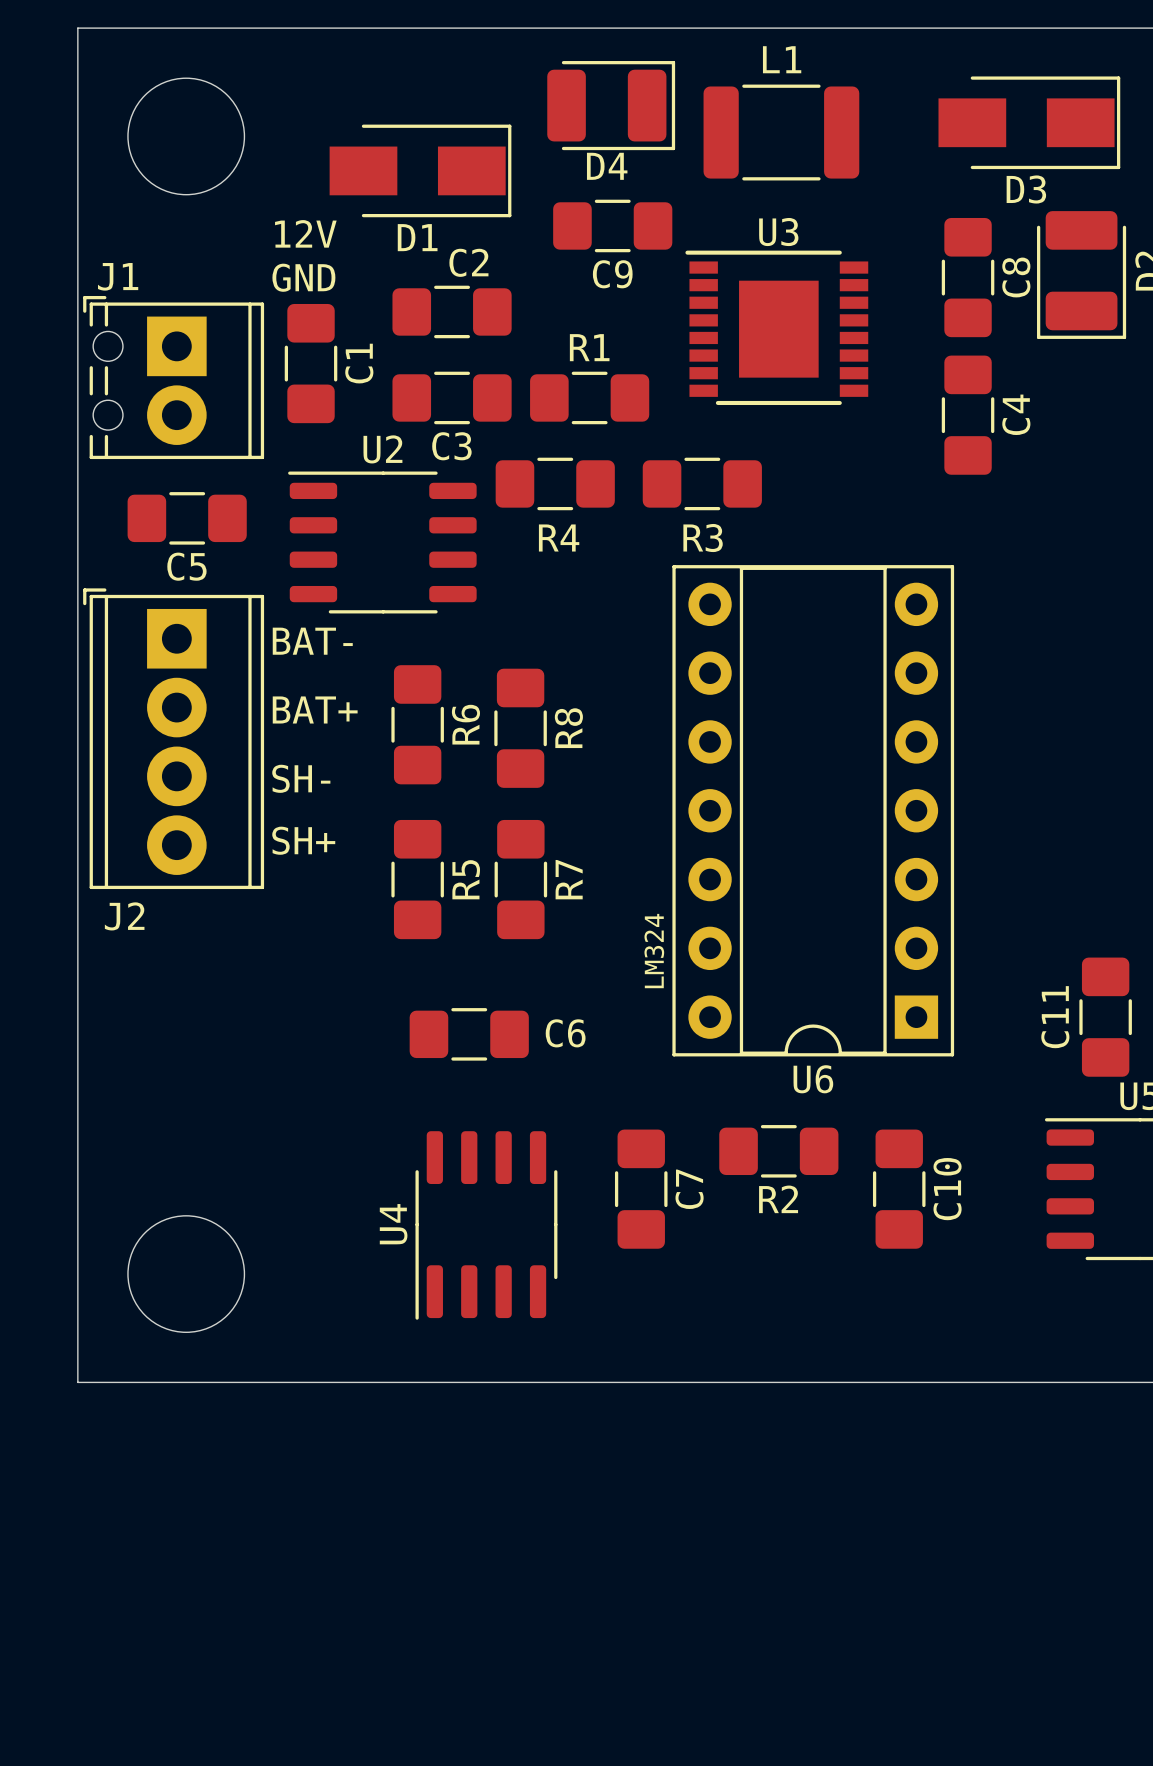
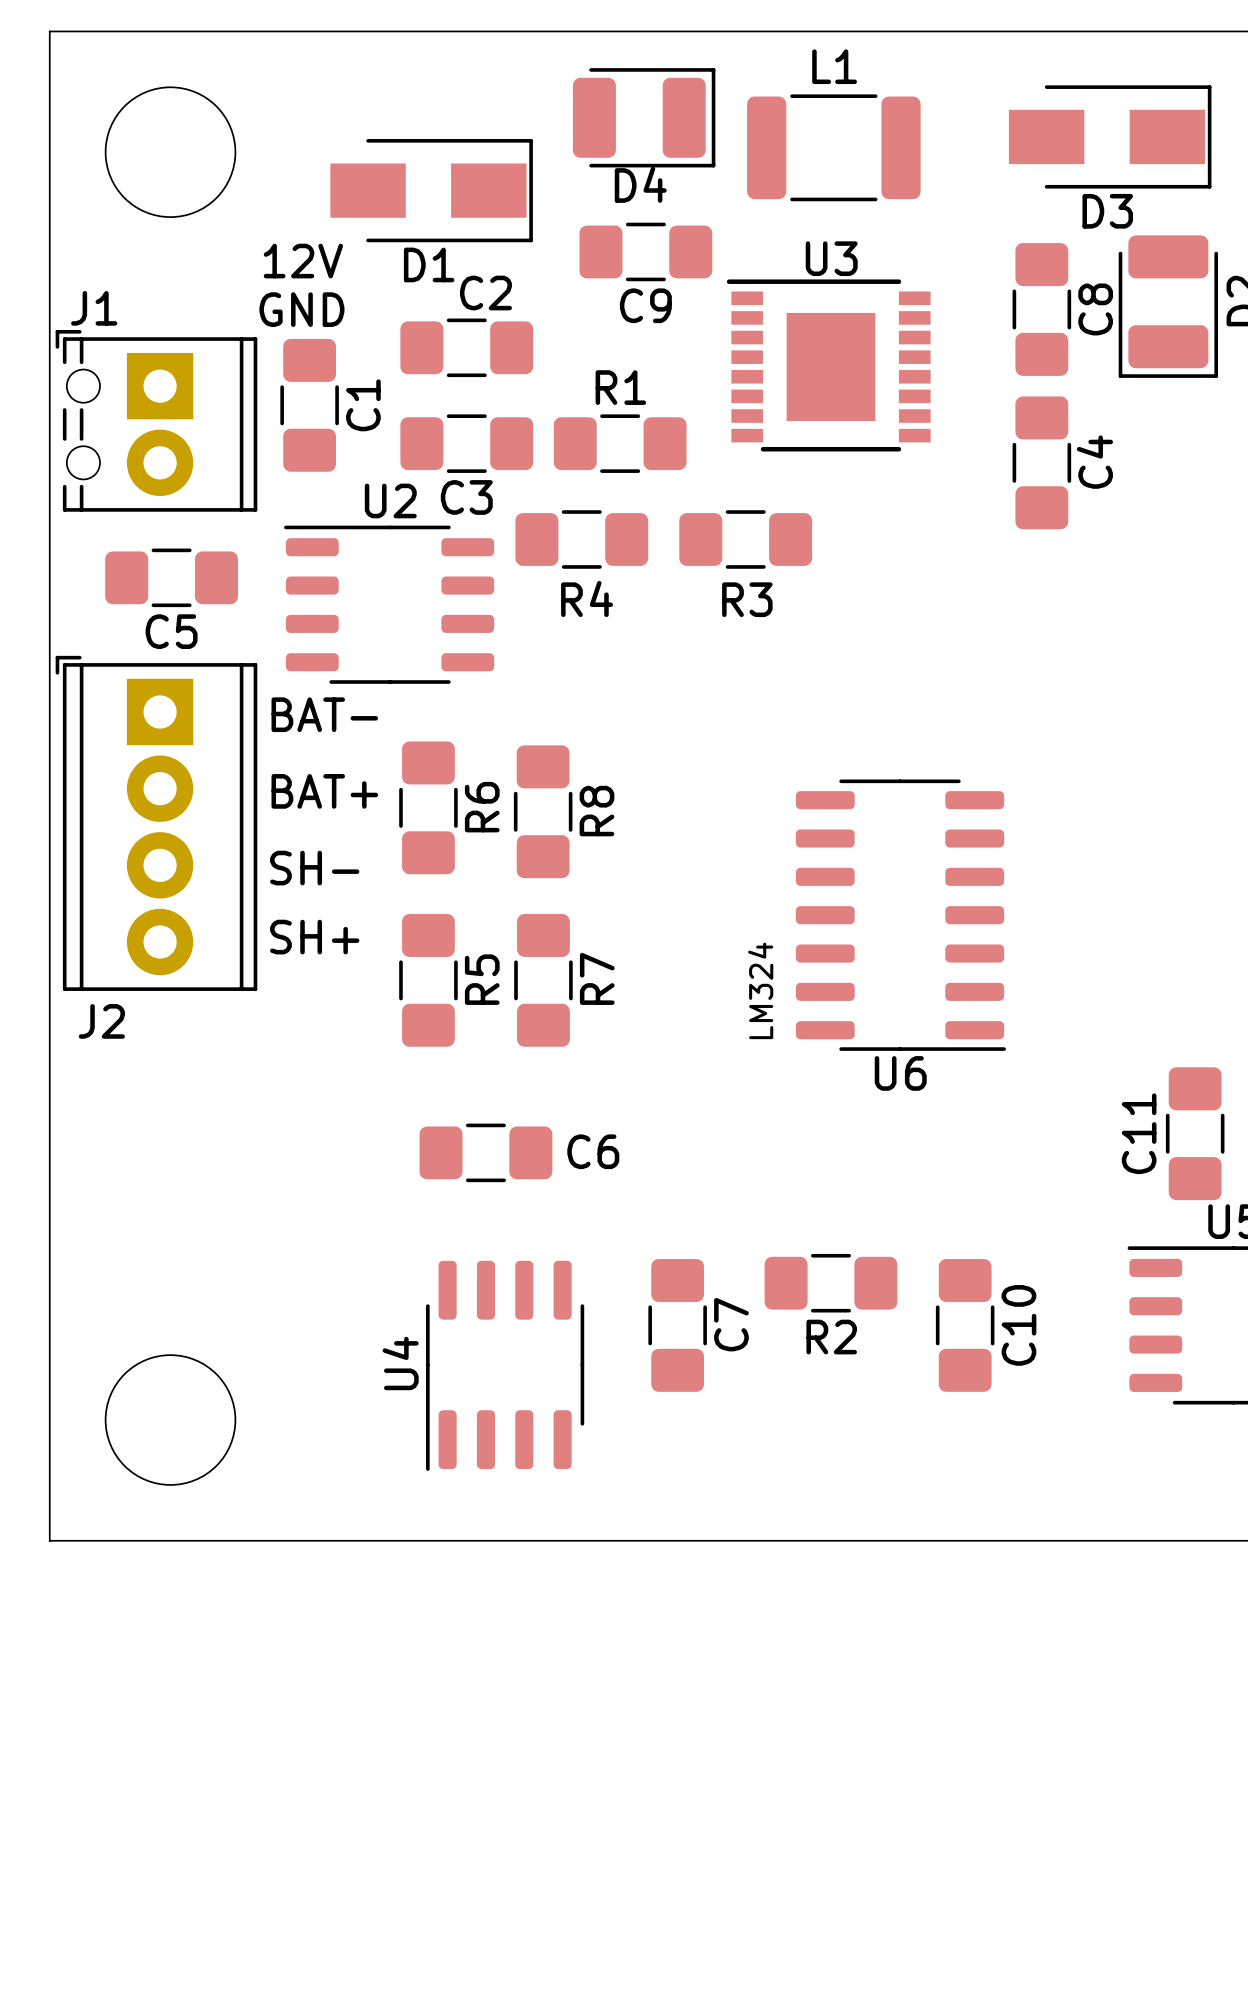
U6 footprint: [672, 565, 955, 1057] -> [795, 779, 1006, 1051]
text position: LM324 (654, 951) -> LM324 (760, 990)
U6 name position: U6 (813, 1079) -> U6 (900, 1073)

